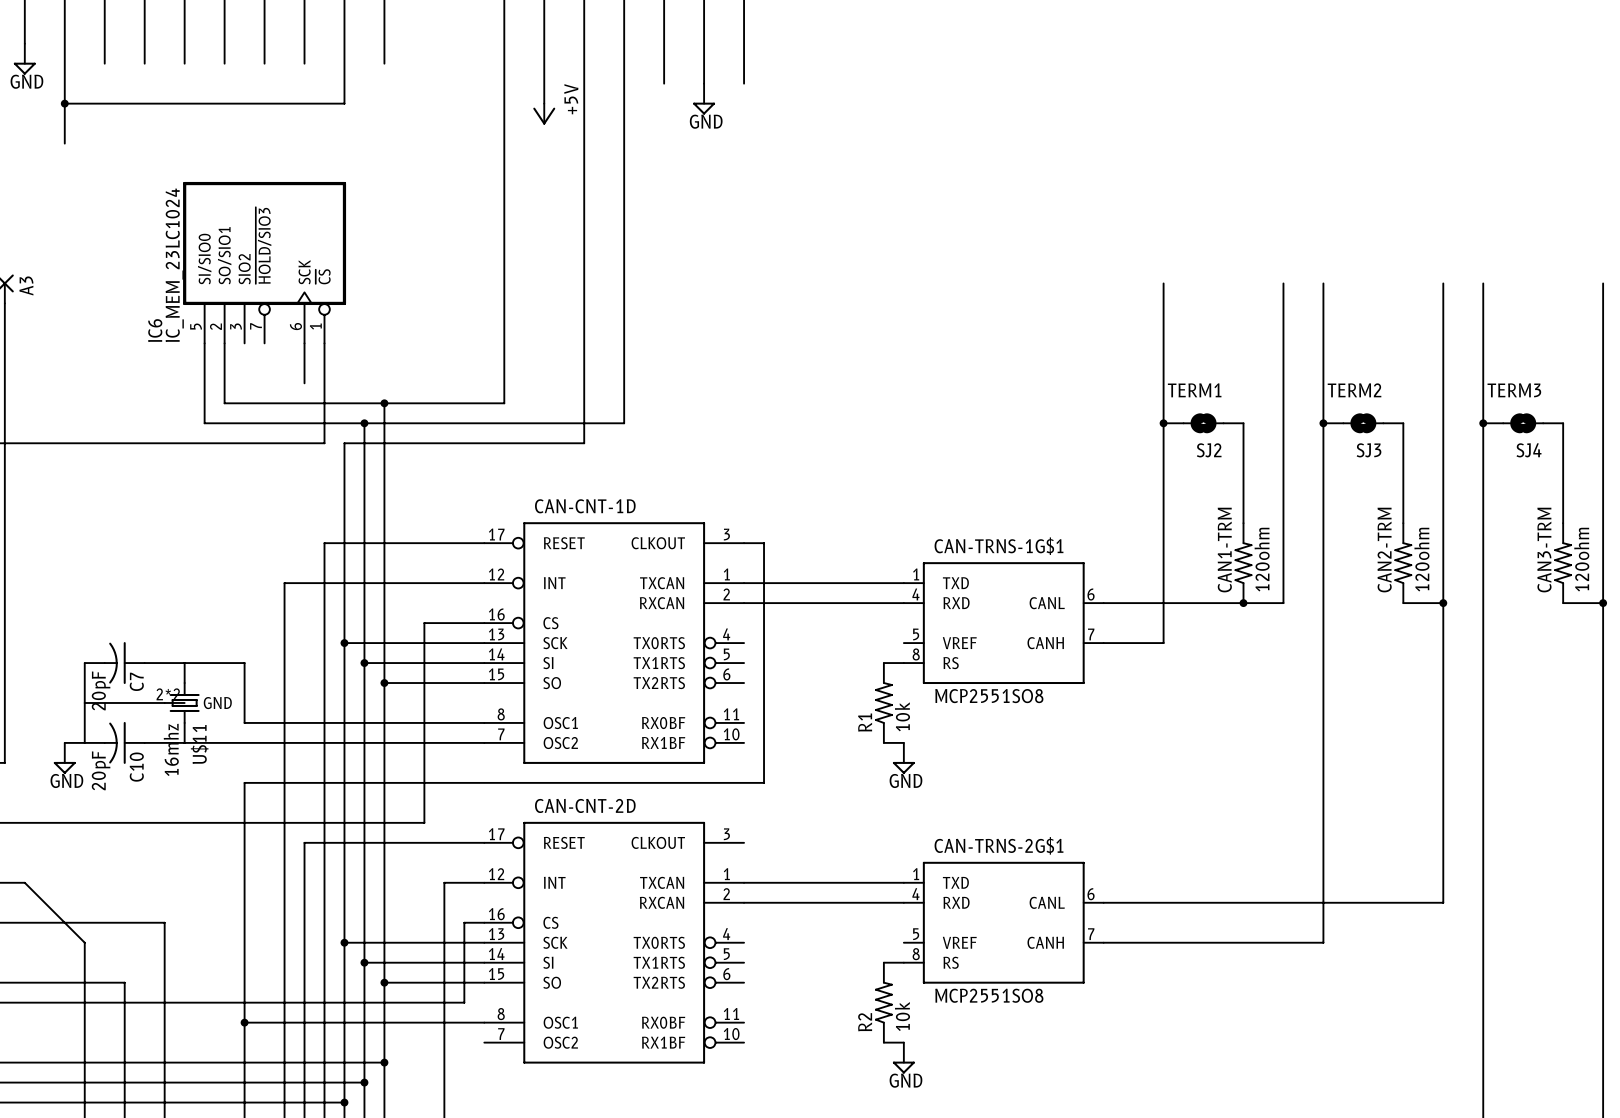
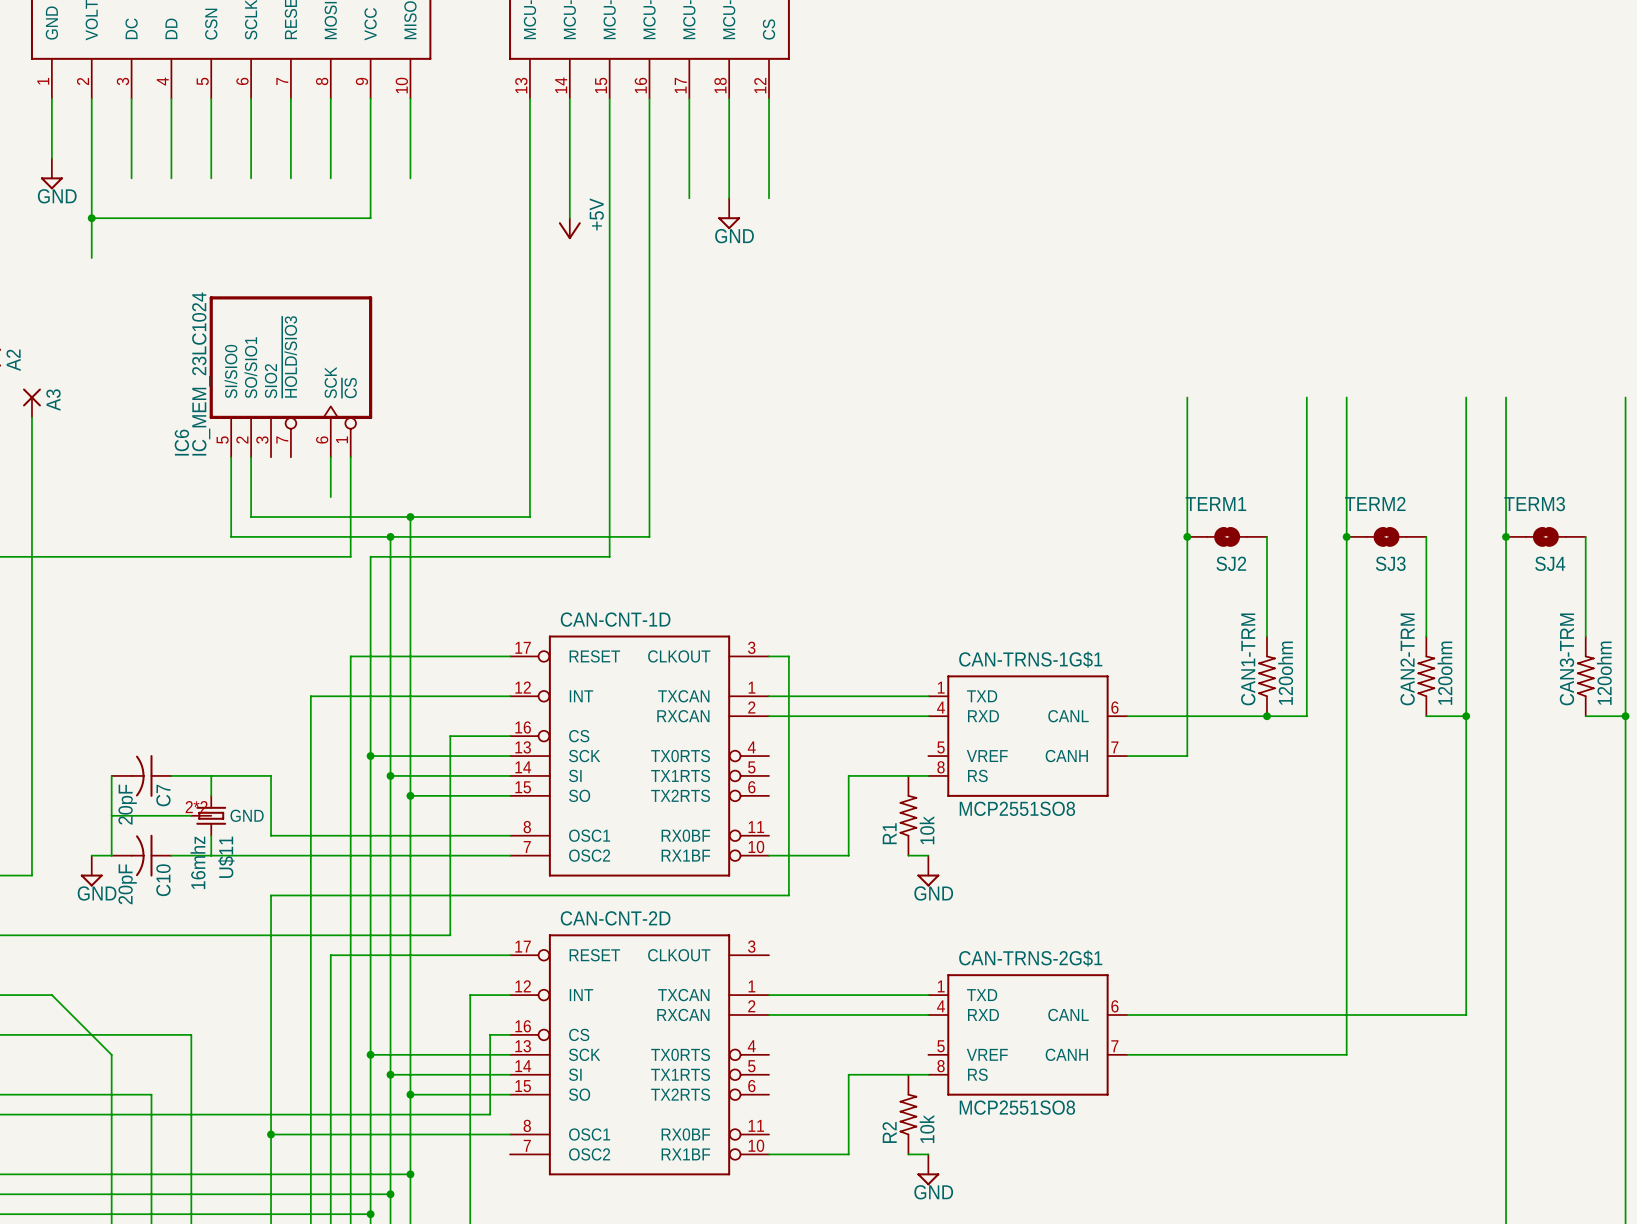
wire: none -> (908, 775) (848, 775) (848, 855) (769, 855)
wire: none -> (908, 1074) (848, 1074) (848, 1154) (769, 1154)

